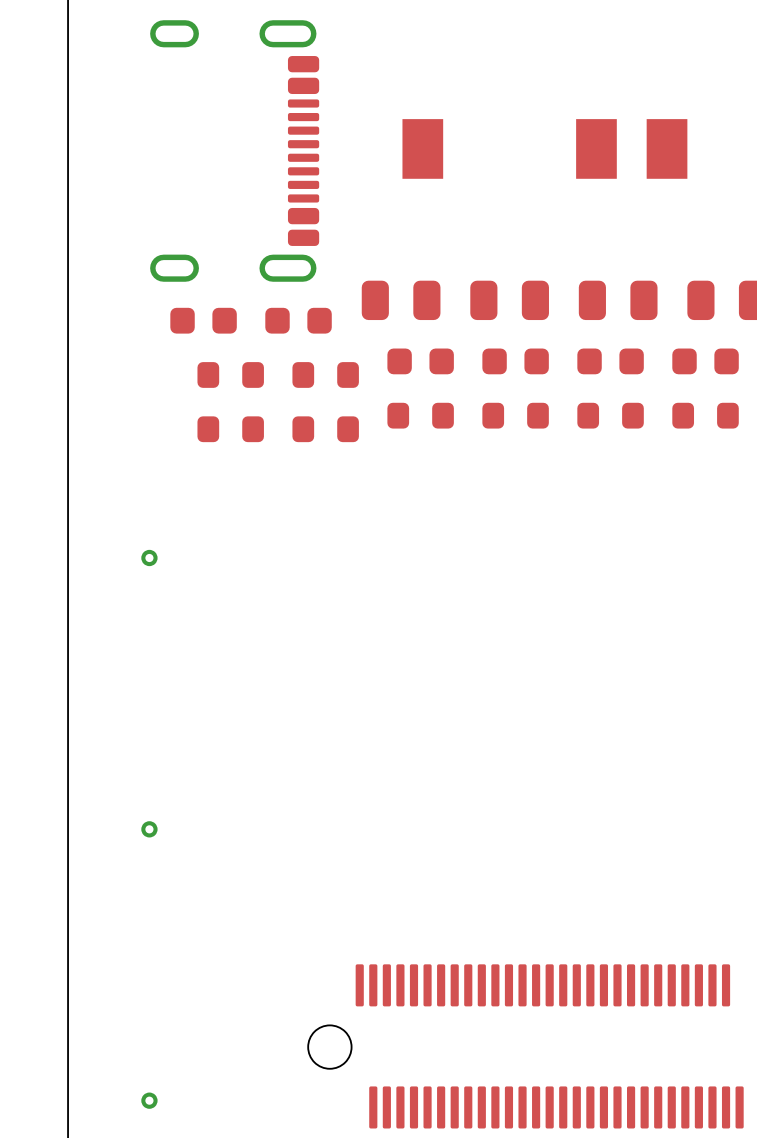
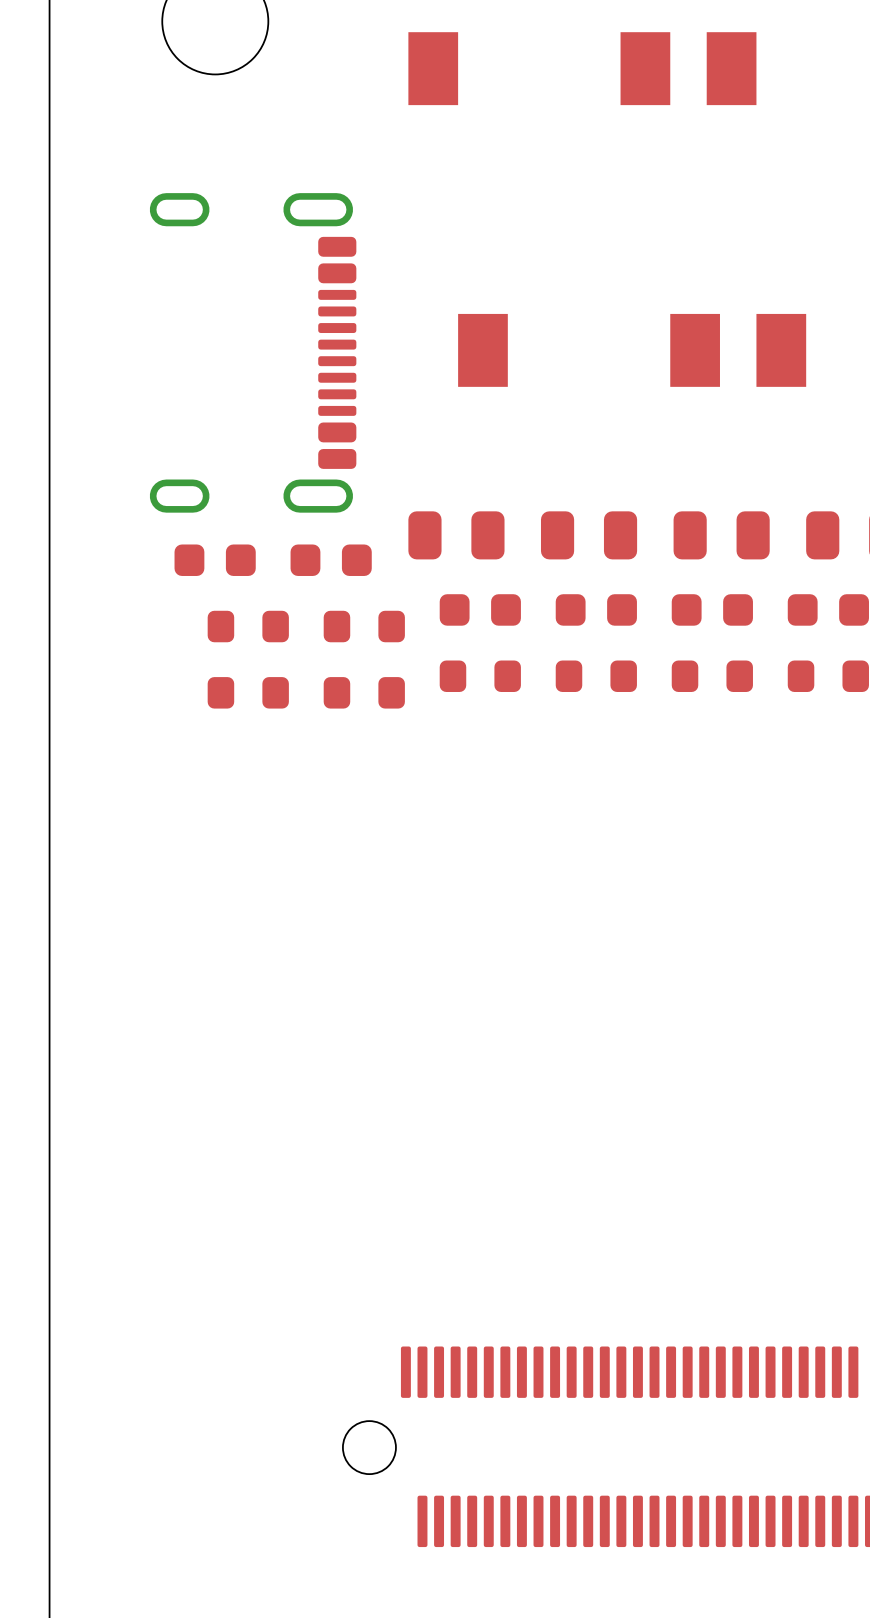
via: (149, 557) -> none
via: (149, 829) -> none
via: (149, 1100) -> none

